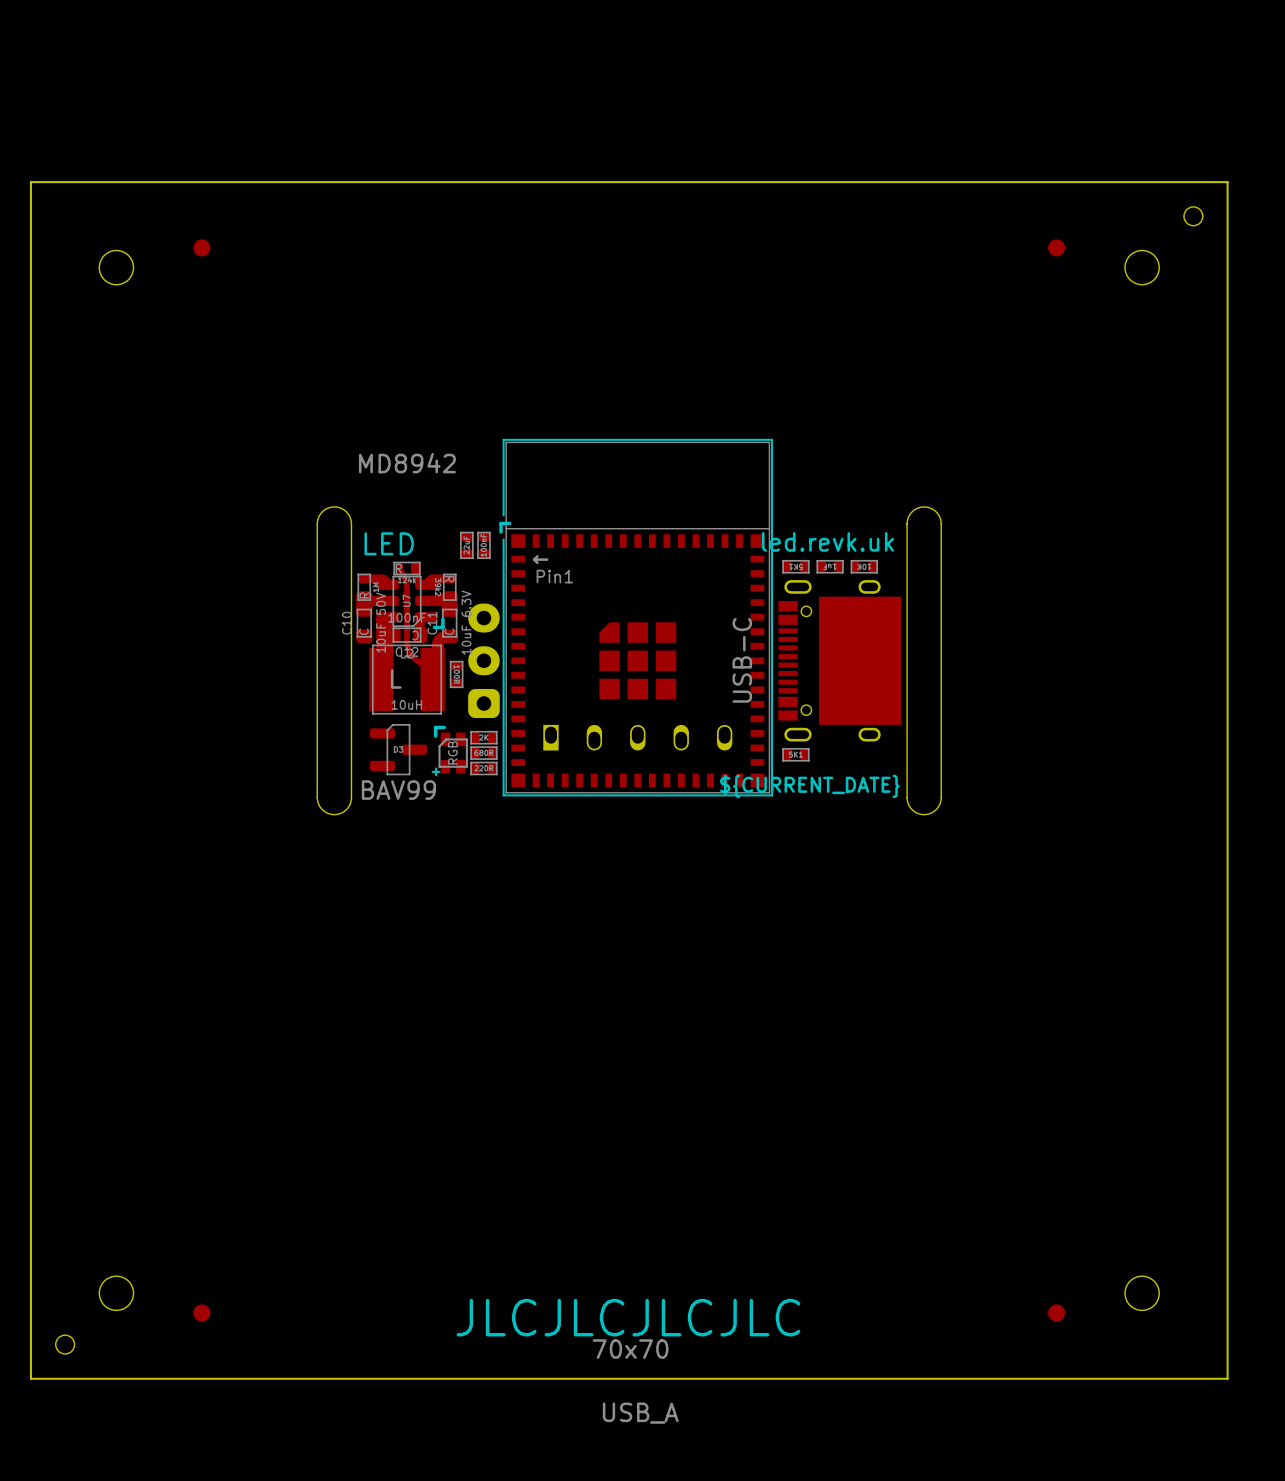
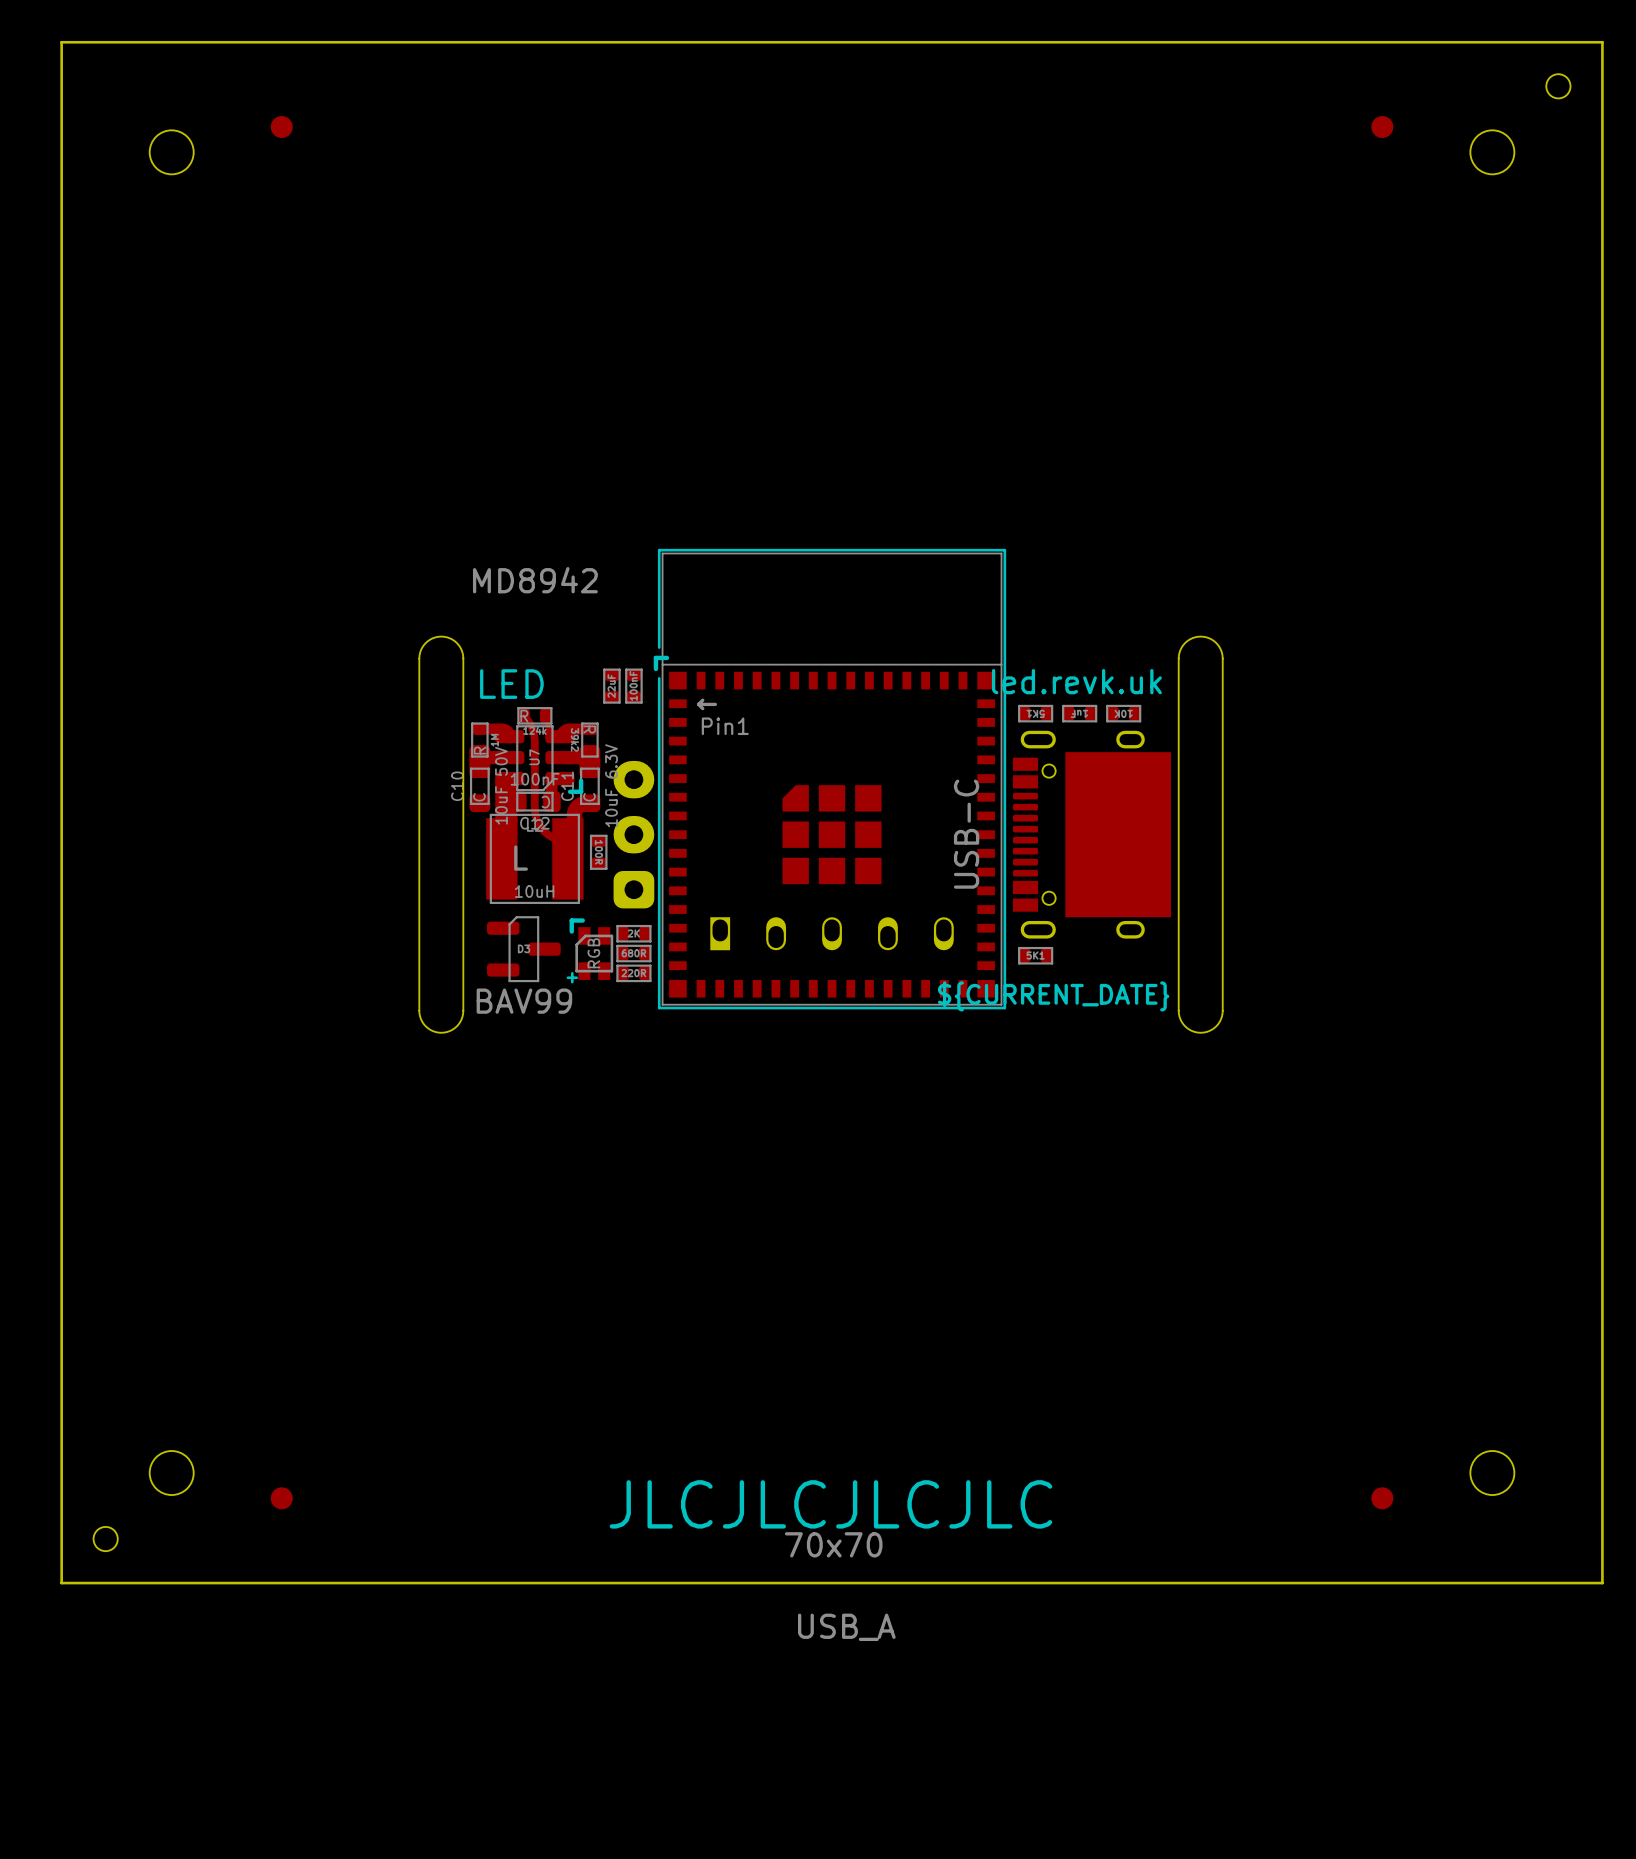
part position: (629, 780) -> (832, 812)
text position: USB_A (640, 1413) -> USB_A (846, 1627)

